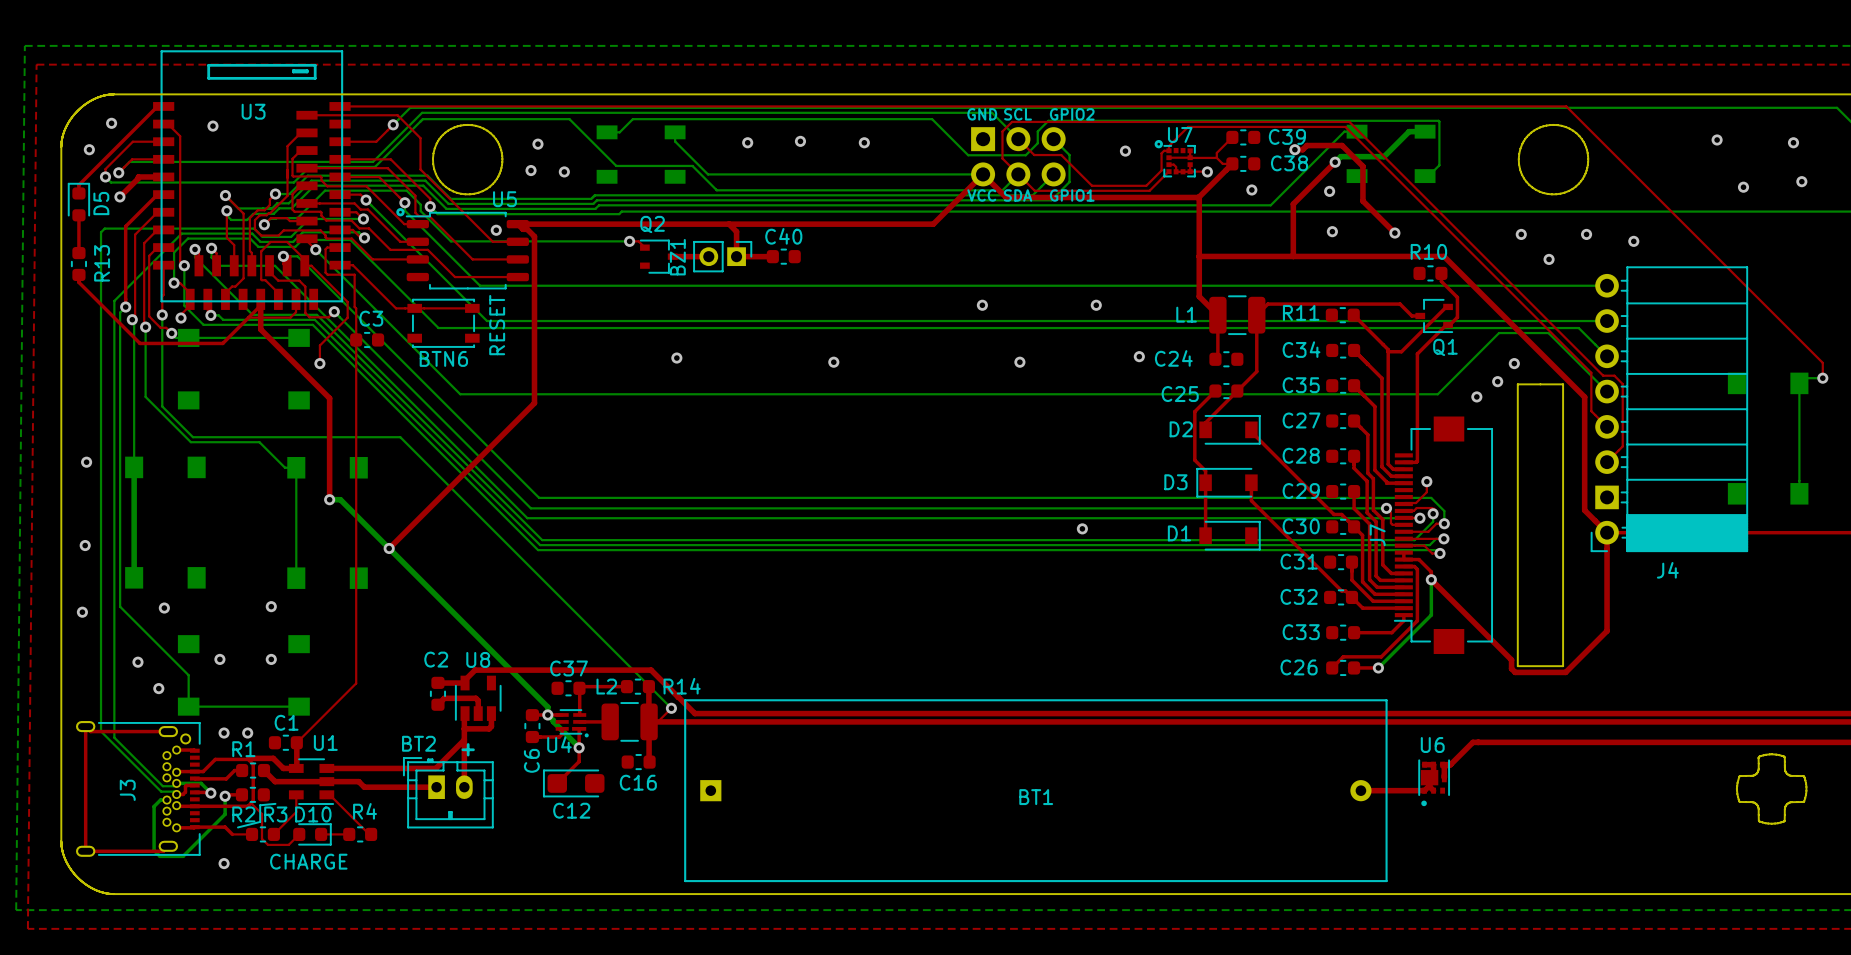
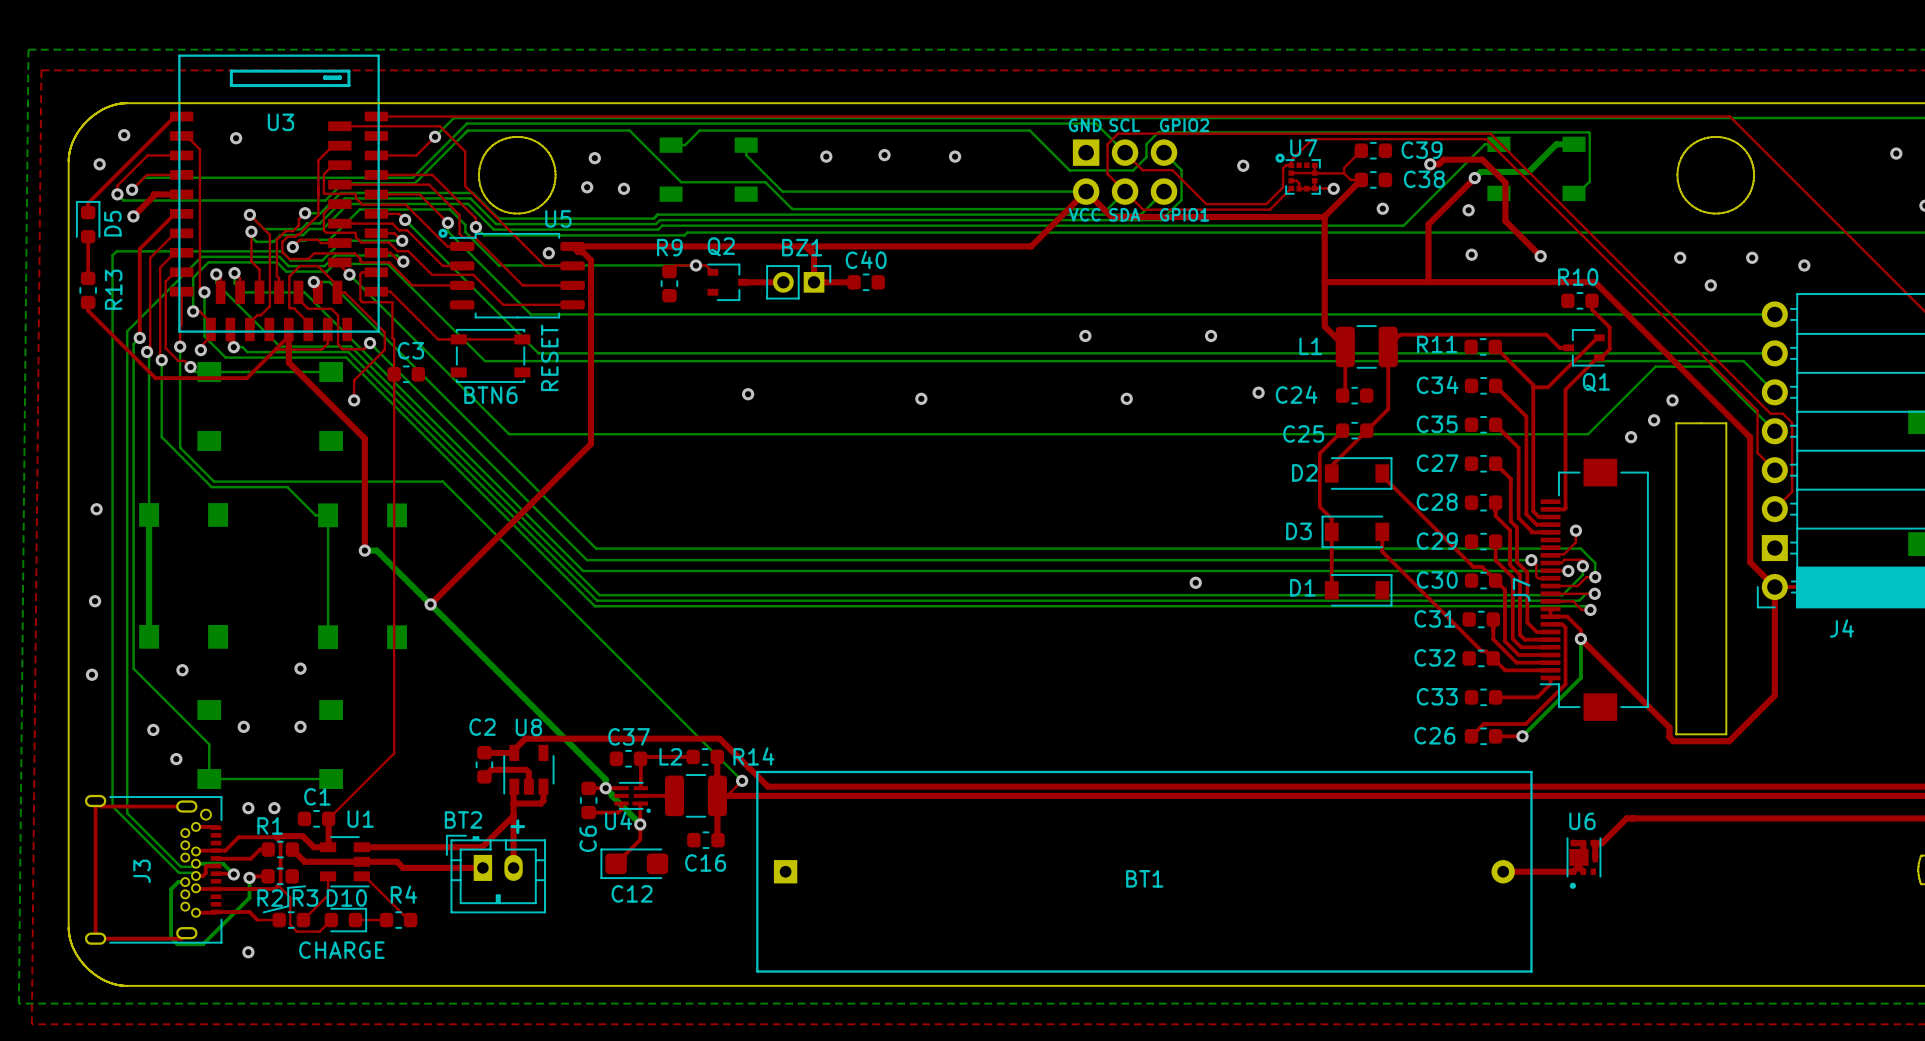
top track: none -> (695, 265) (675, 265) (669, 271)
R9: none -> (669, 283)
BZ1 name rotation: 0° (677, 257) -> 90° clockwise (802, 247)
BZ1 name position: BZ1 (677, 257) -> BZ1 (802, 247)

